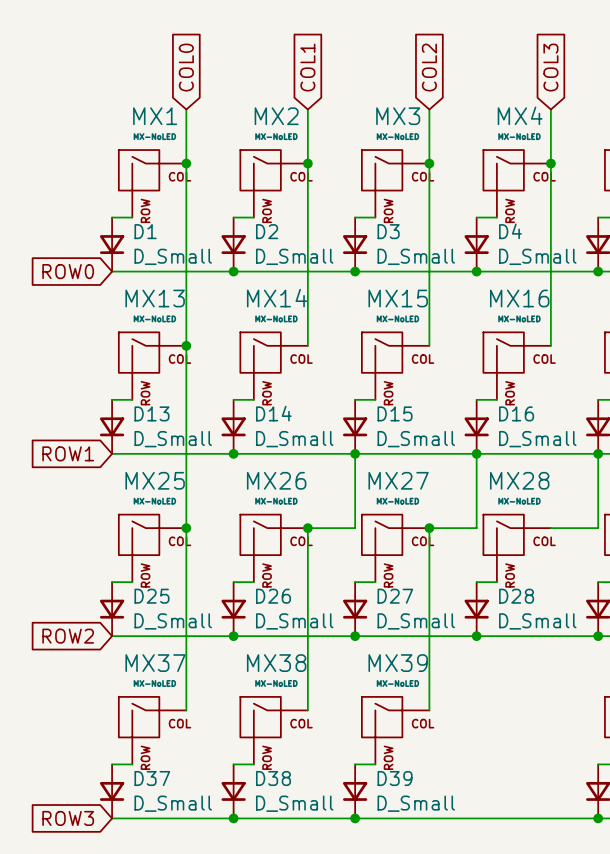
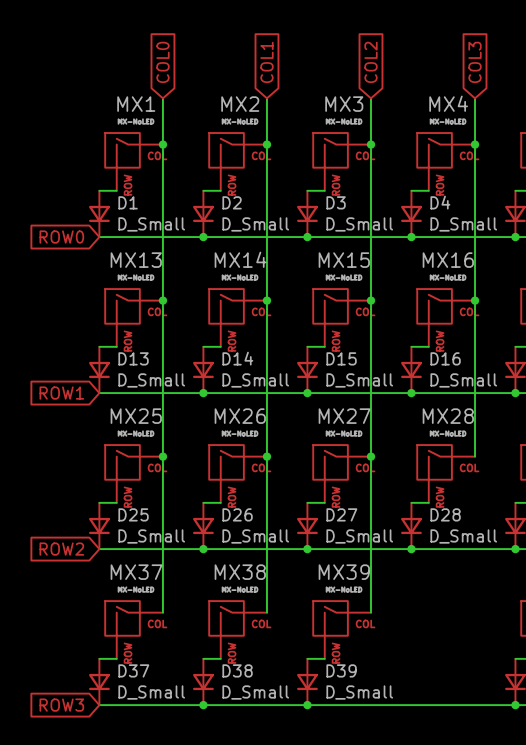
junction: none -> (266, 300)
junction: none -> (370, 300)
junction: none -> (475, 300)
wire: (355, 453) (355, 528) (307, 528) -> (266, 300) (266, 456)
wire: (476, 453) (476, 528) (429, 528) -> (370, 300) (370, 456)
wire: (598, 453) (598, 528) (550, 528) -> (475, 300) (475, 456)

